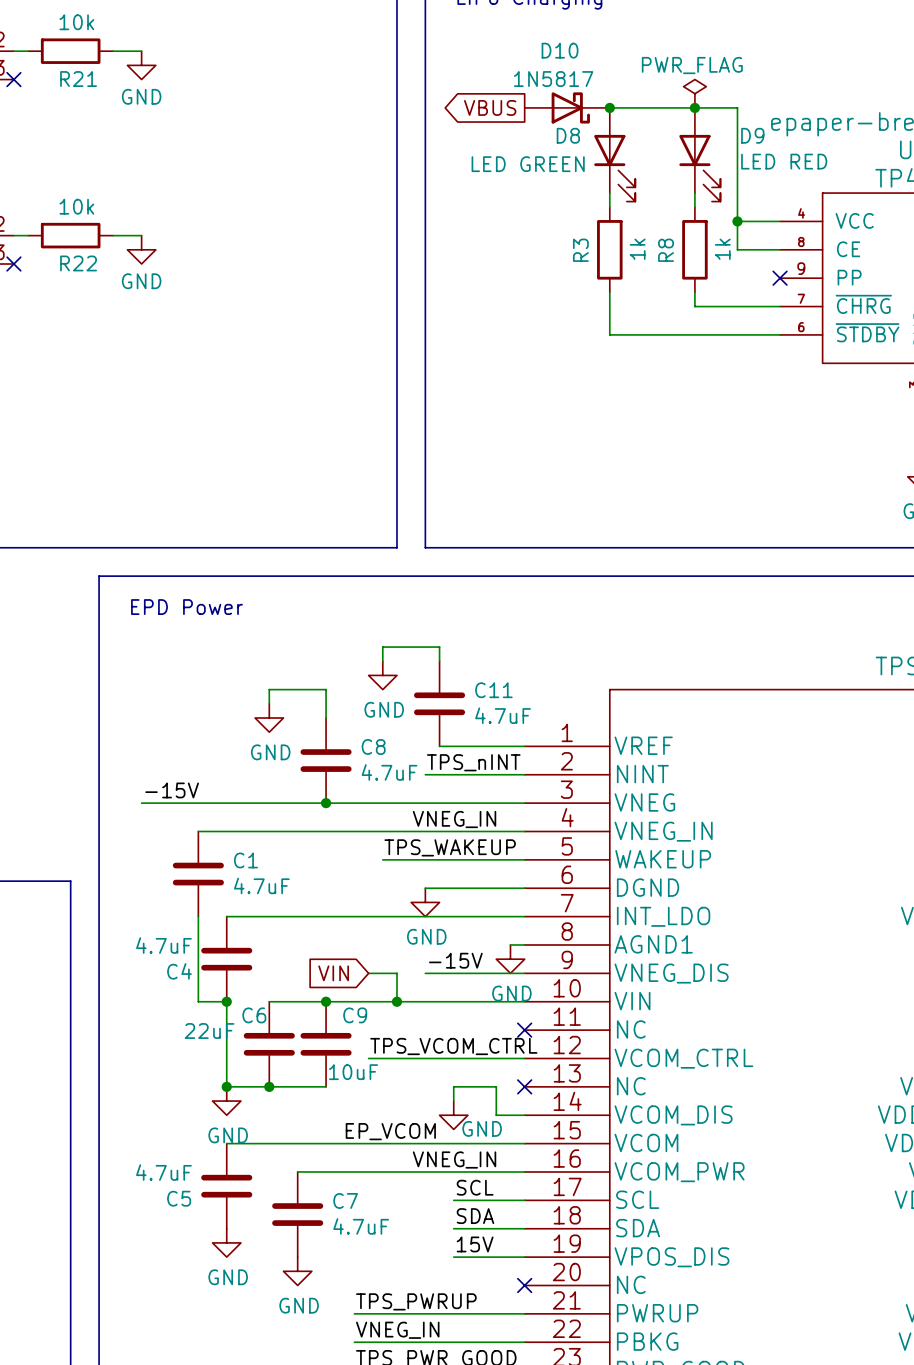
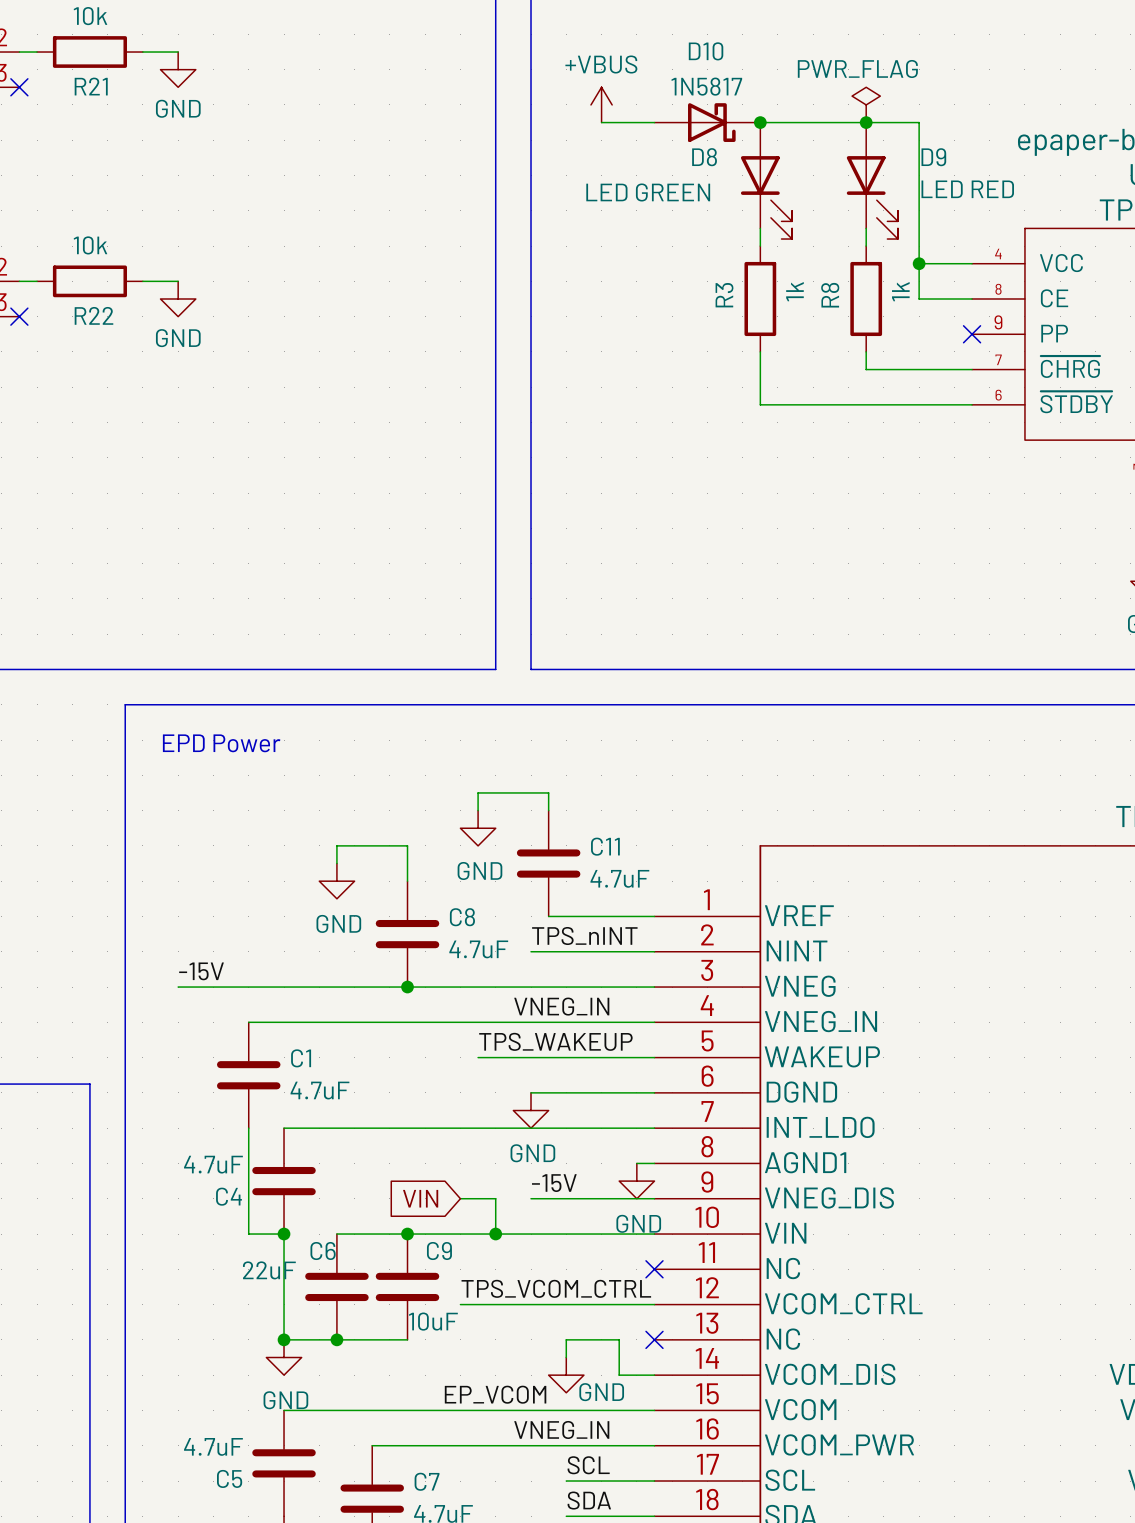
power symbol: none -> +VBUS (601, 104)
wire: none -> (601, 122) (654, 122)
global label: VBUS (490, 107) -> none

